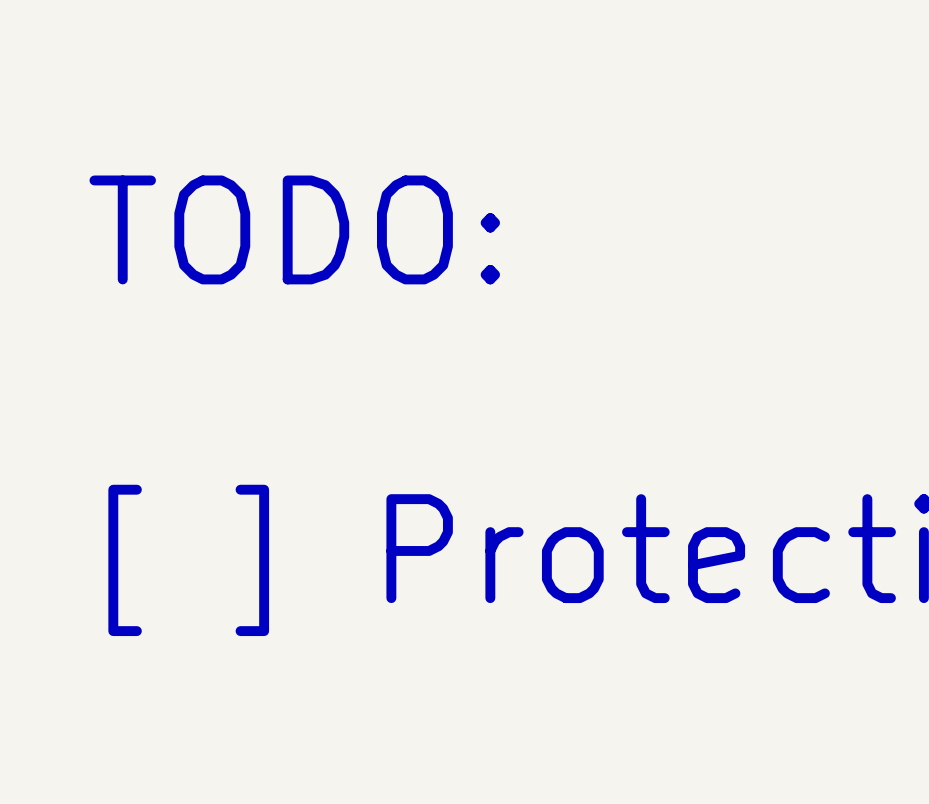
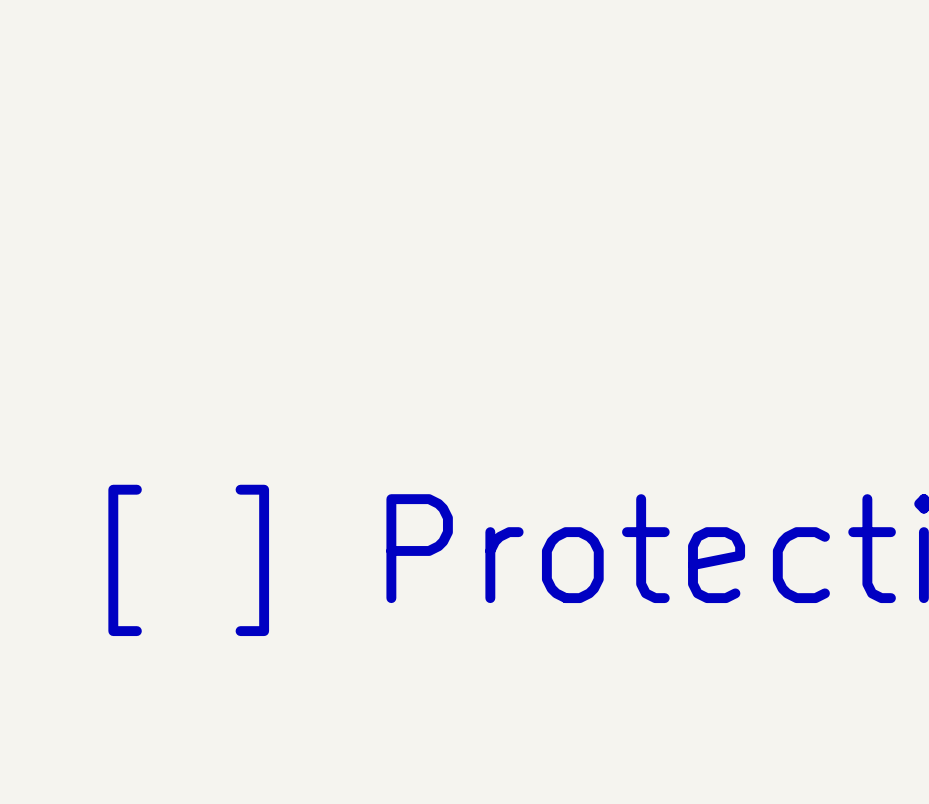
text: TODO: (294, 229) -> none

